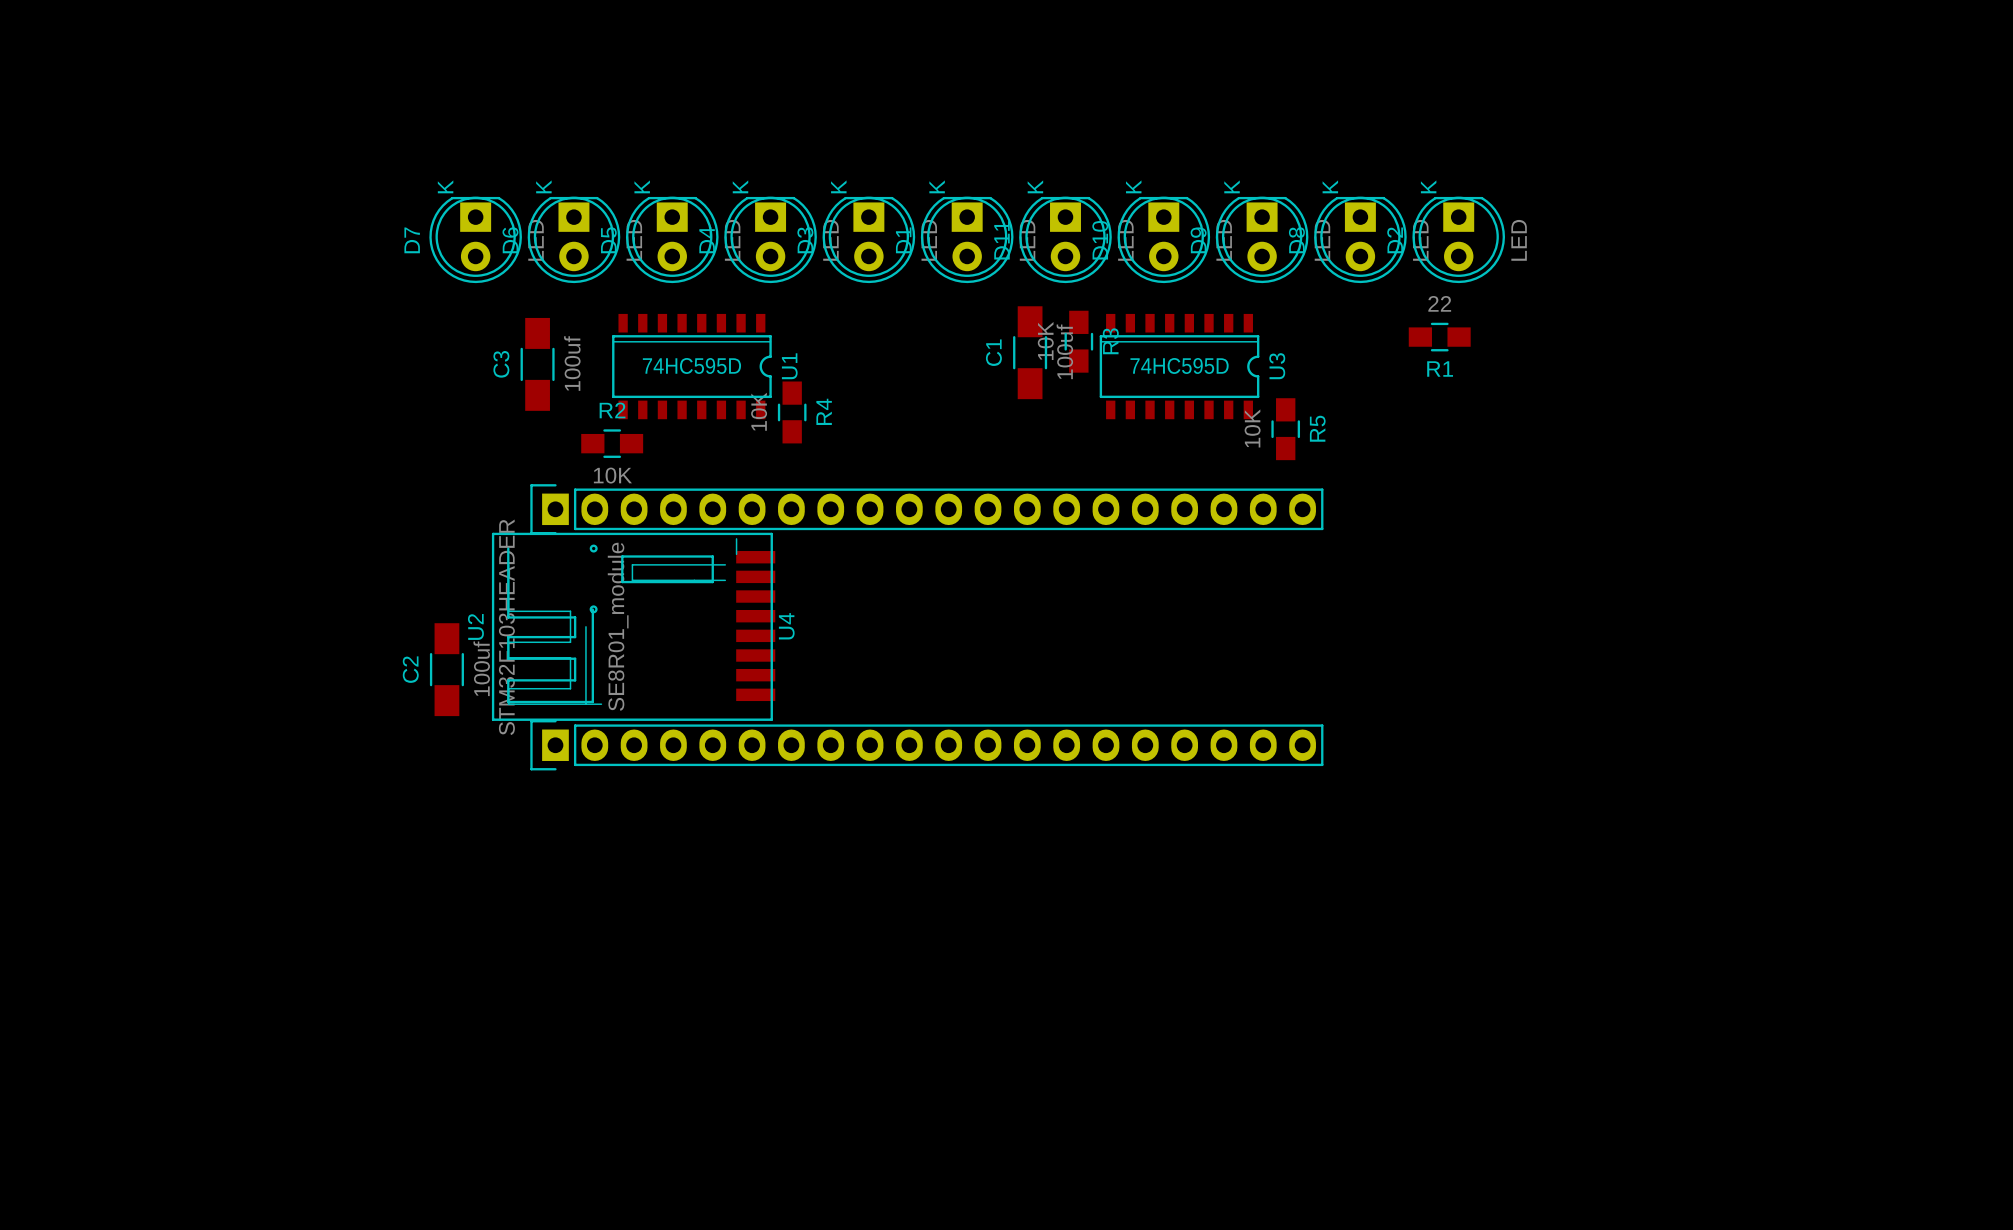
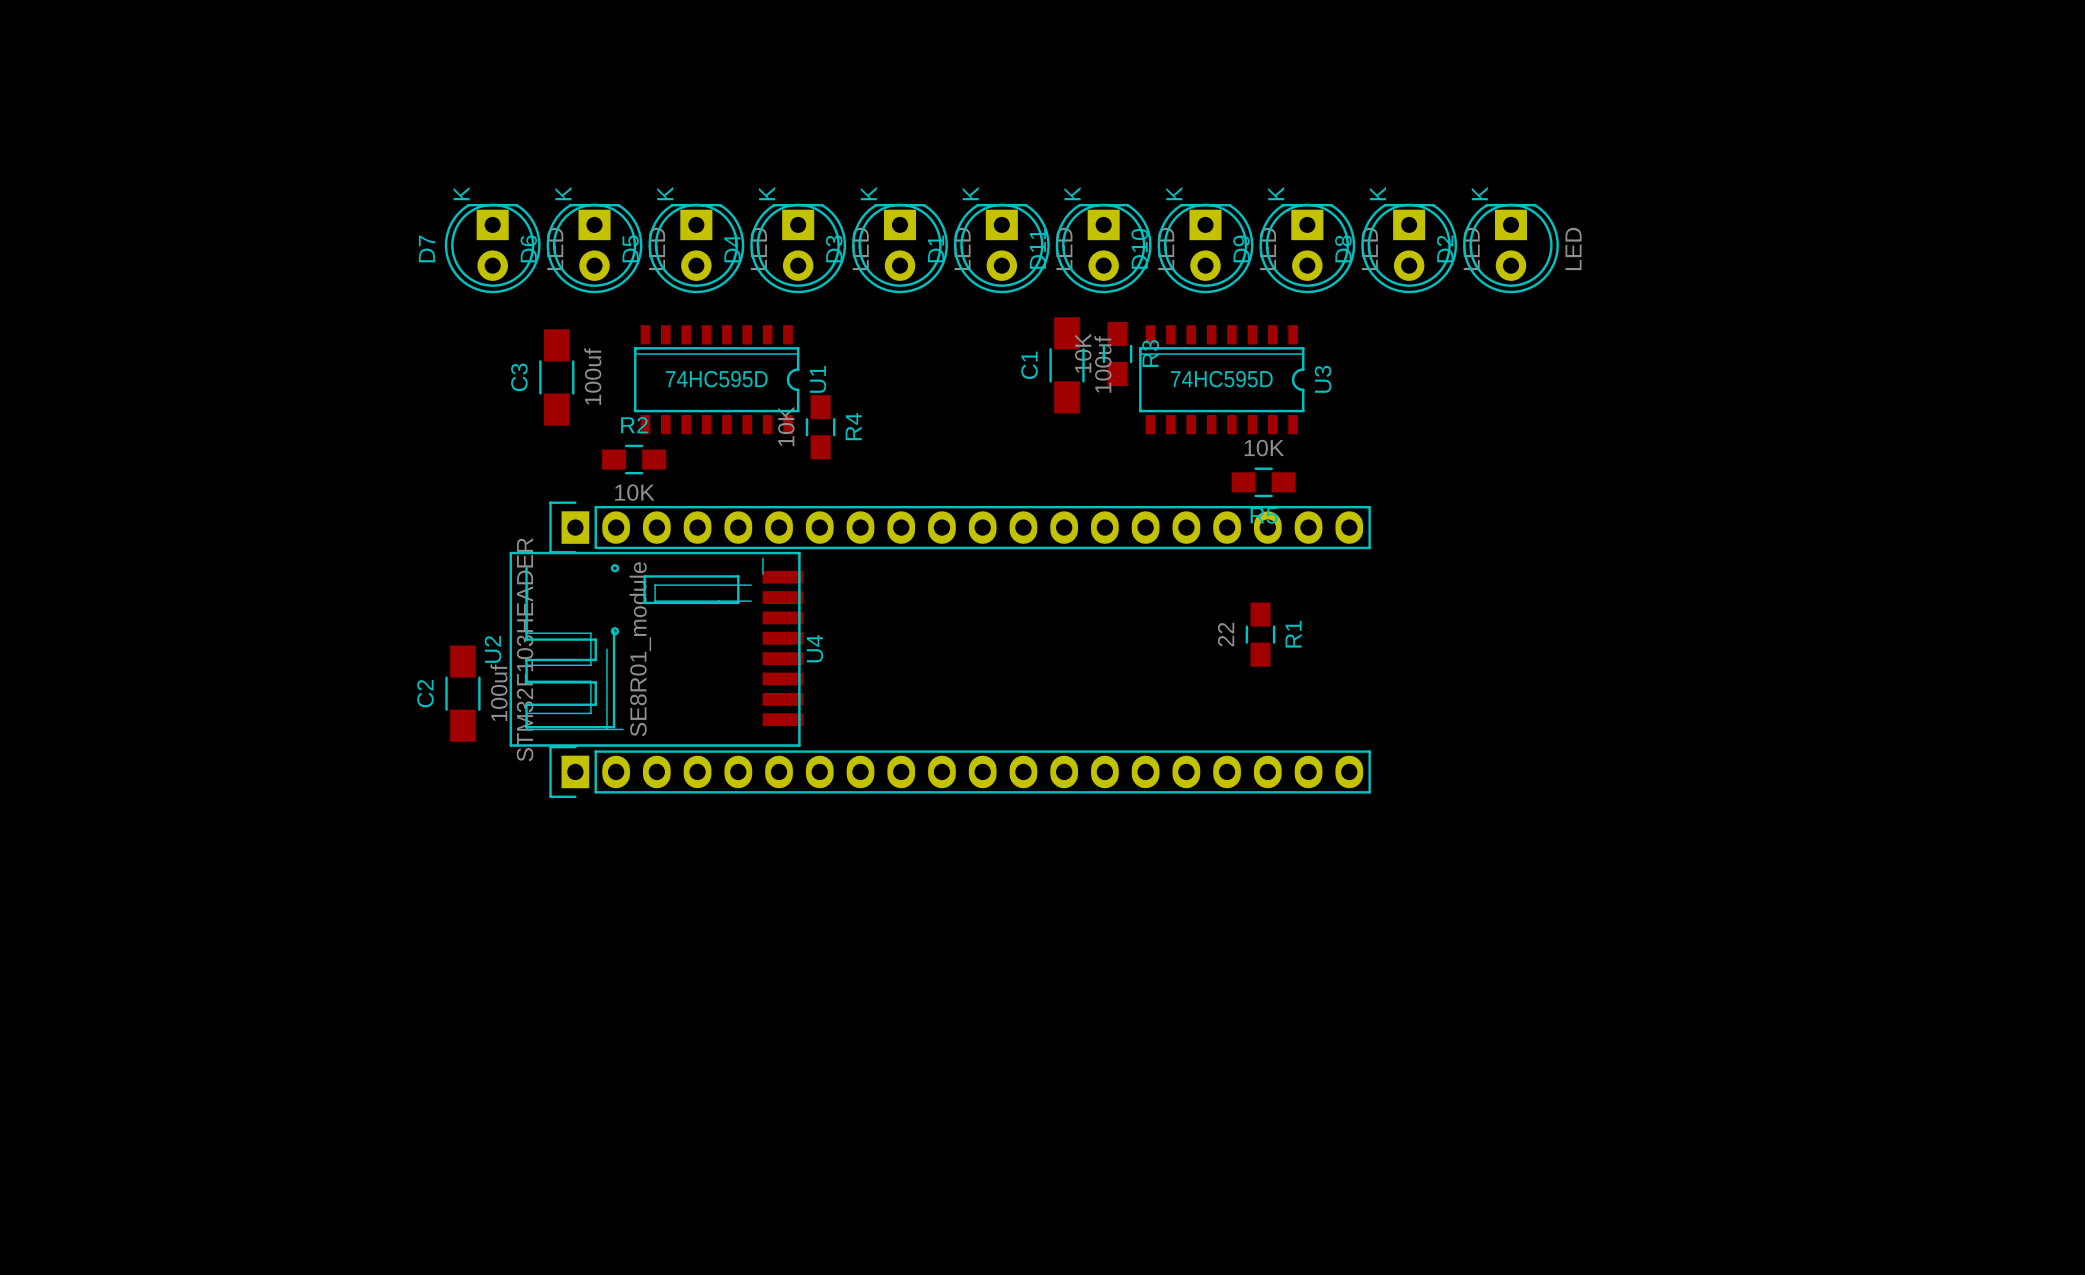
R1 value position: 22 (1439, 303) -> 22 (1226, 634)
R1 rotation: 0° (1439, 337) -> 90° clockwise (1260, 634)
R1 position: (1439, 337) -> (1260, 634)
R1 name position: R1 (1440, 369) -> R1 (1293, 634)
R5 rotation: 0° (1285, 429) -> 90° clockwise (1263, 482)
R5 position: (1285, 429) -> (1263, 482)

